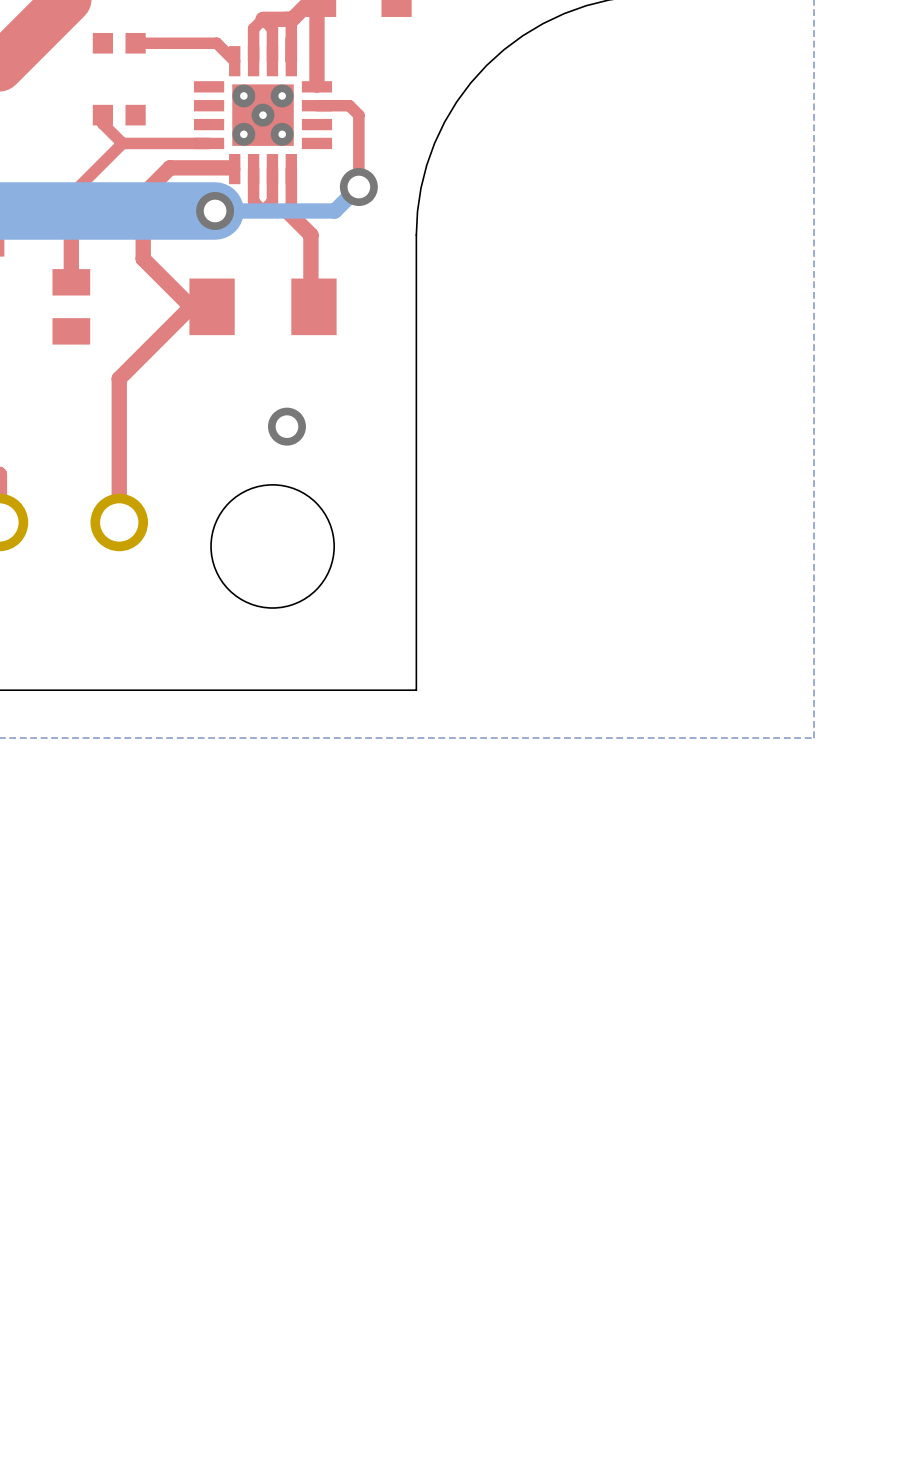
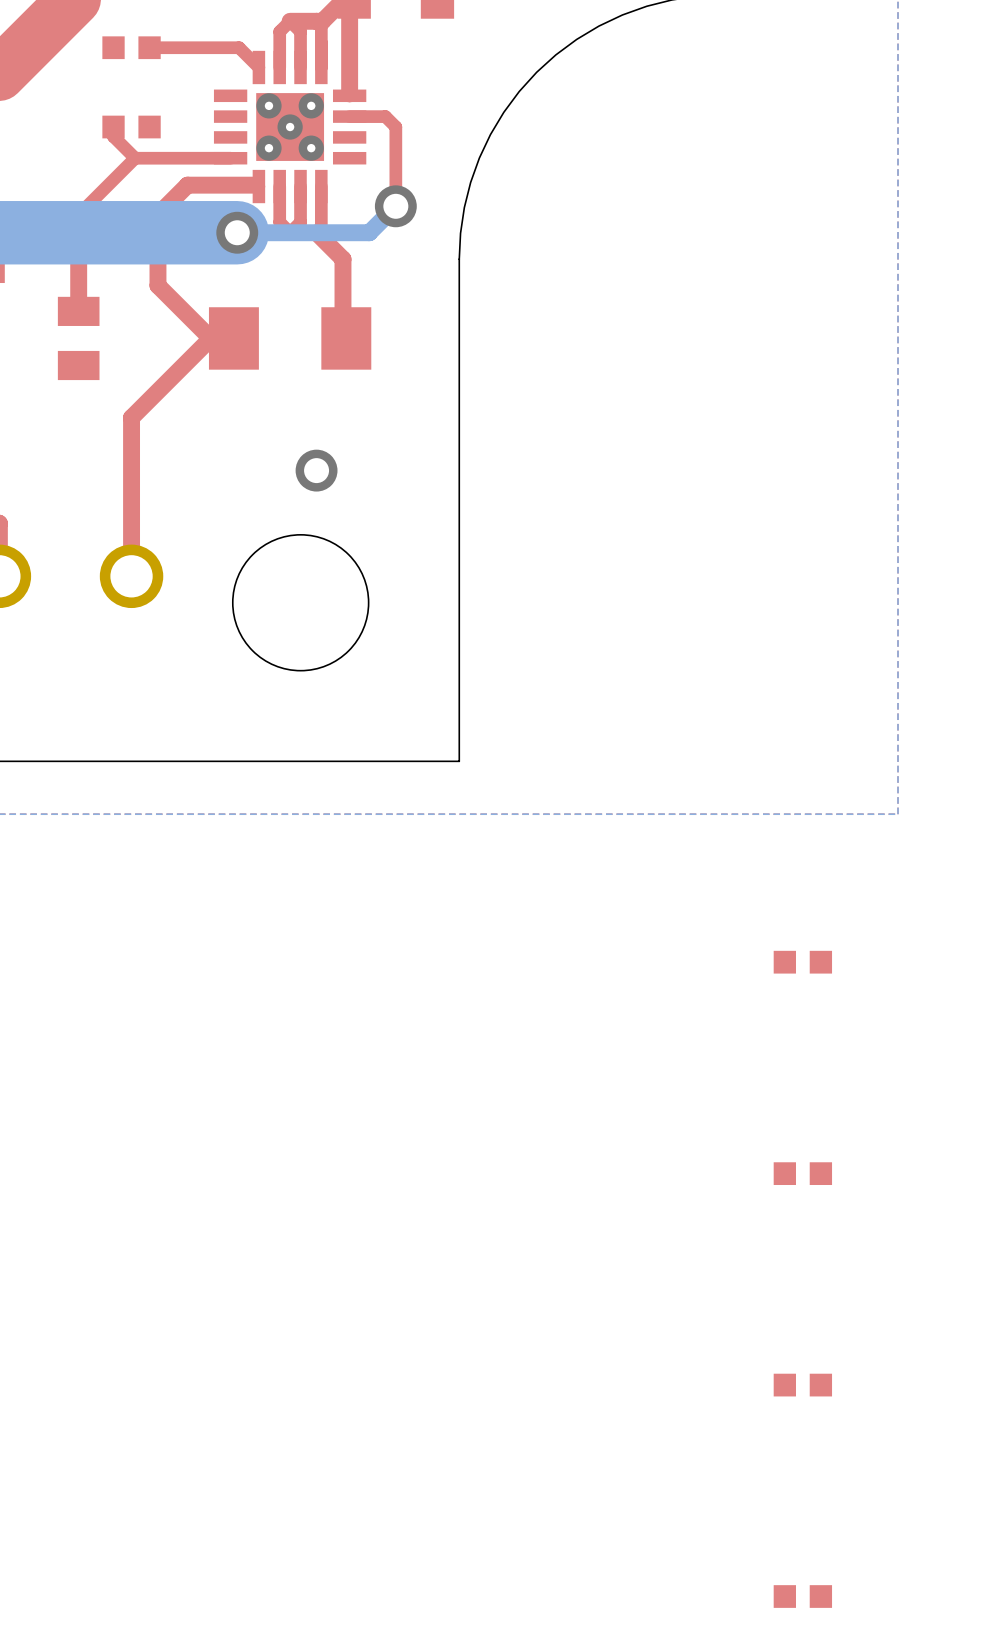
part: none -> (802, 962)
part: none -> (802, 1173)
part: none -> (802, 1385)
part: none -> (802, 1596)

